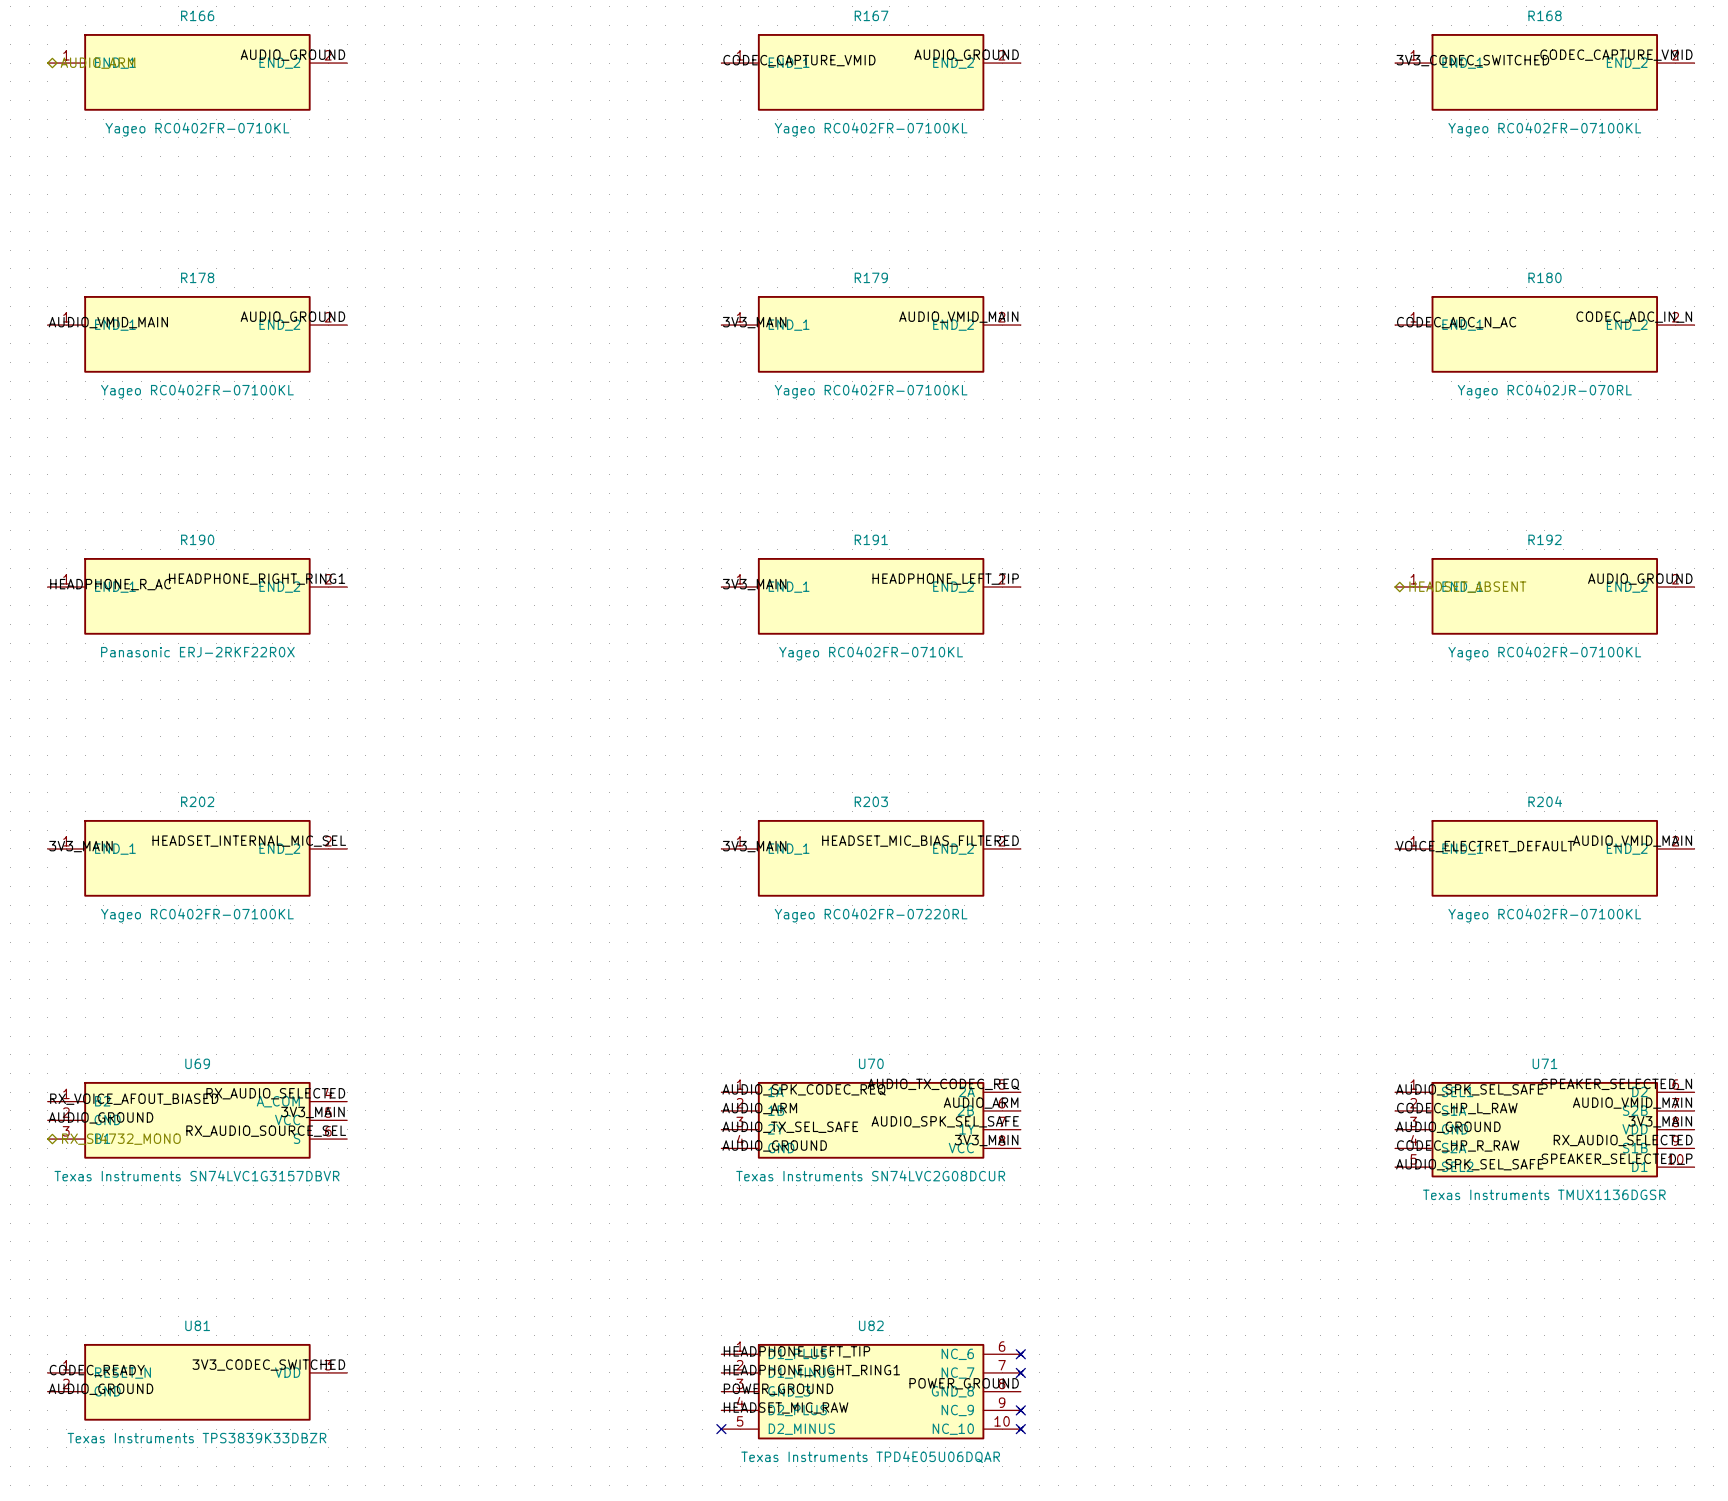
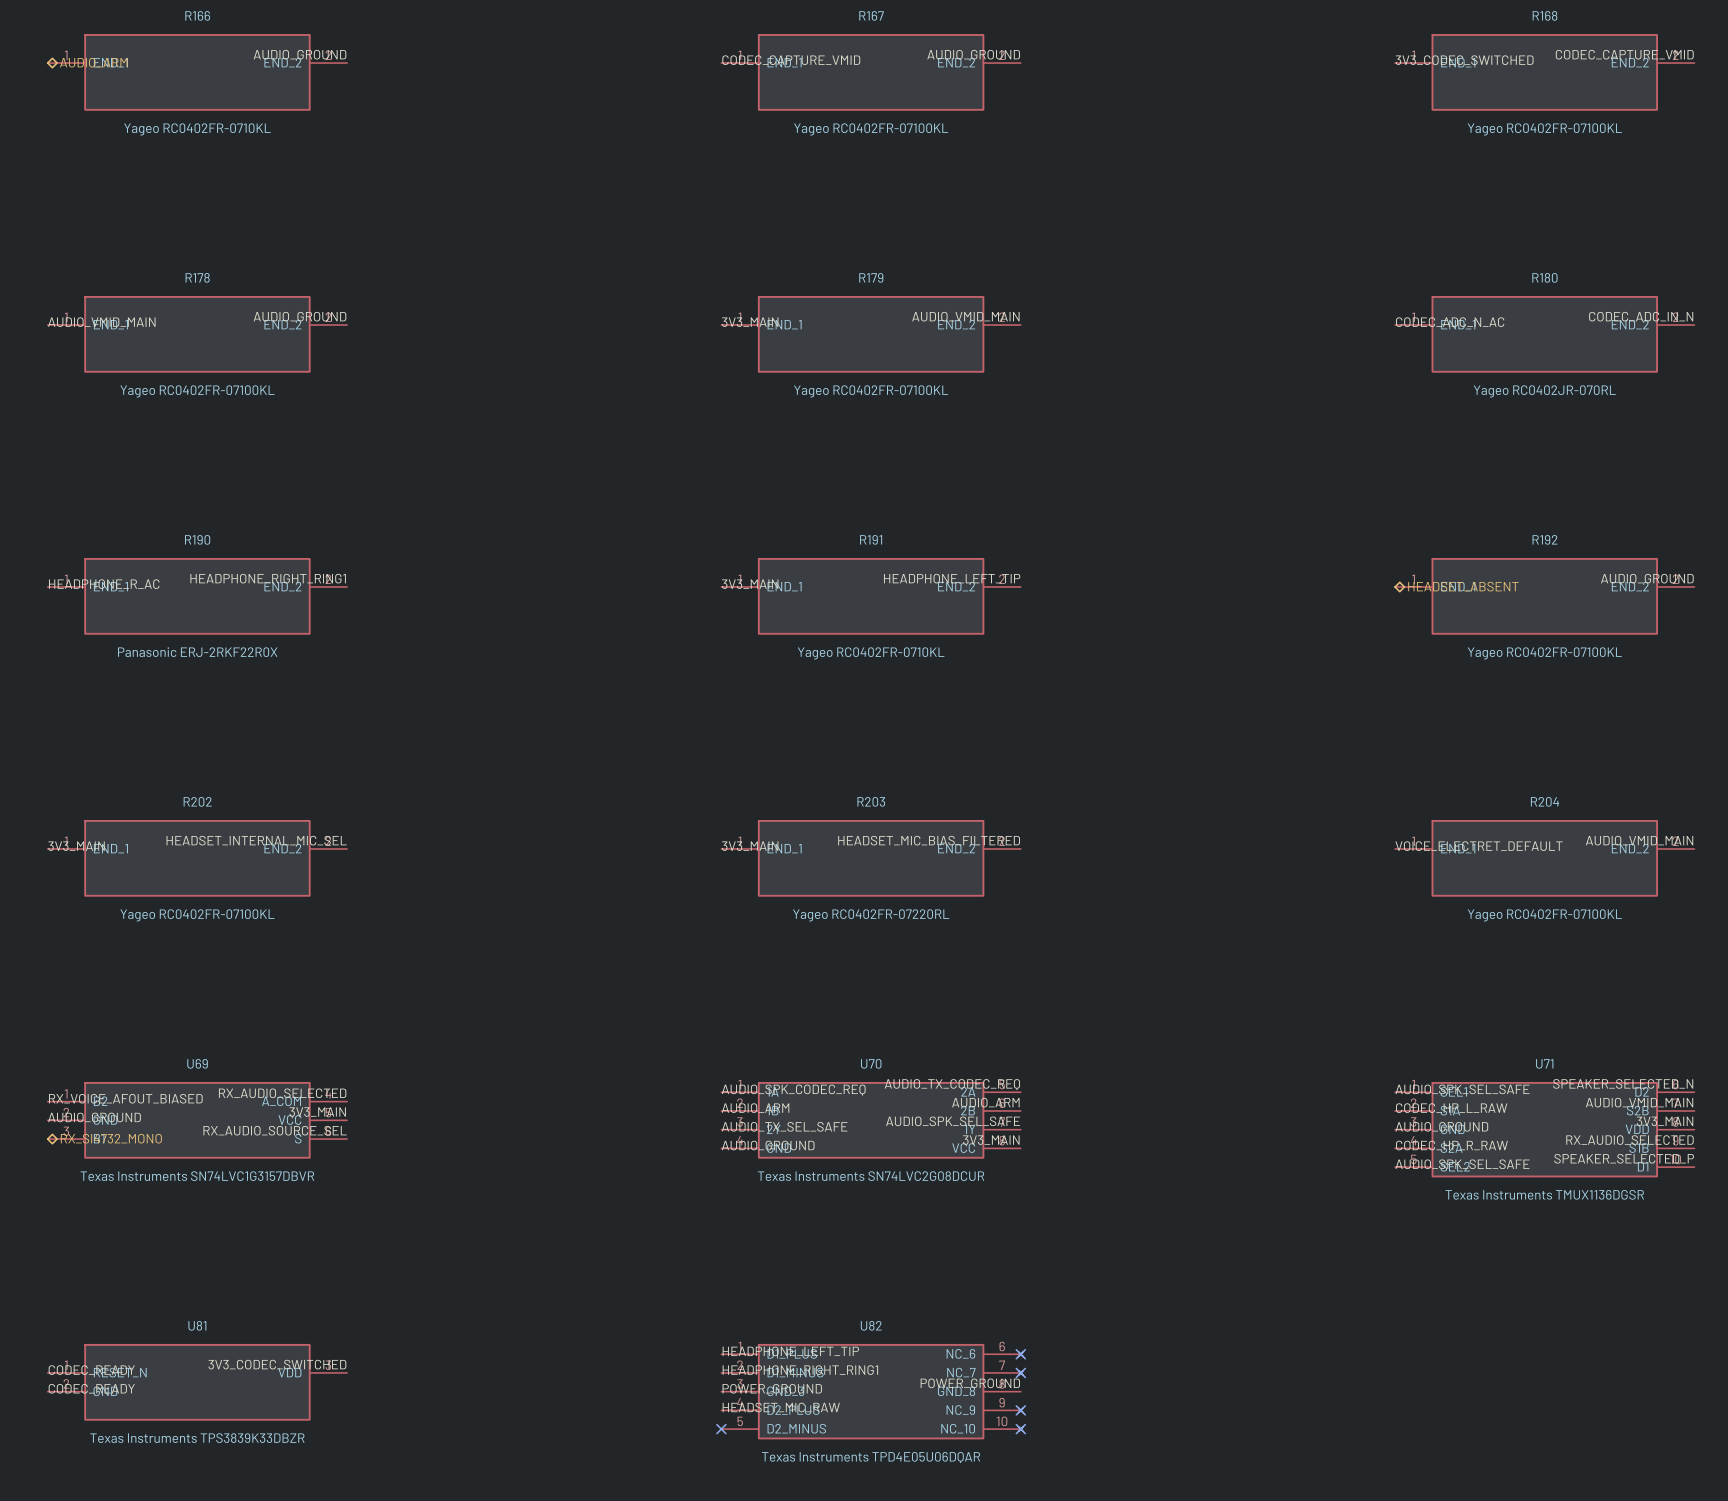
label: AUDIO_GROUND (101, 1389) -> CODEC_READY (91, 1388)

